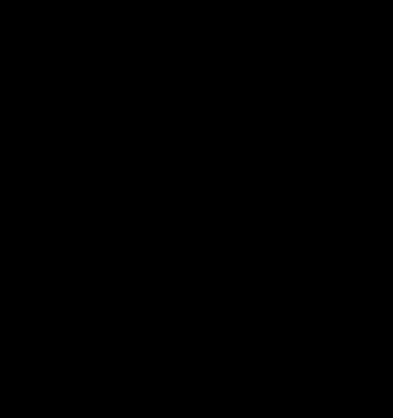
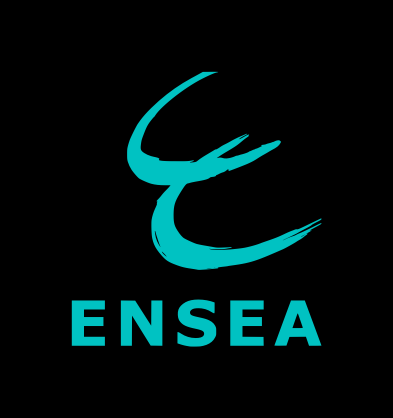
drawing: none -> [71, 71, 322, 347]

